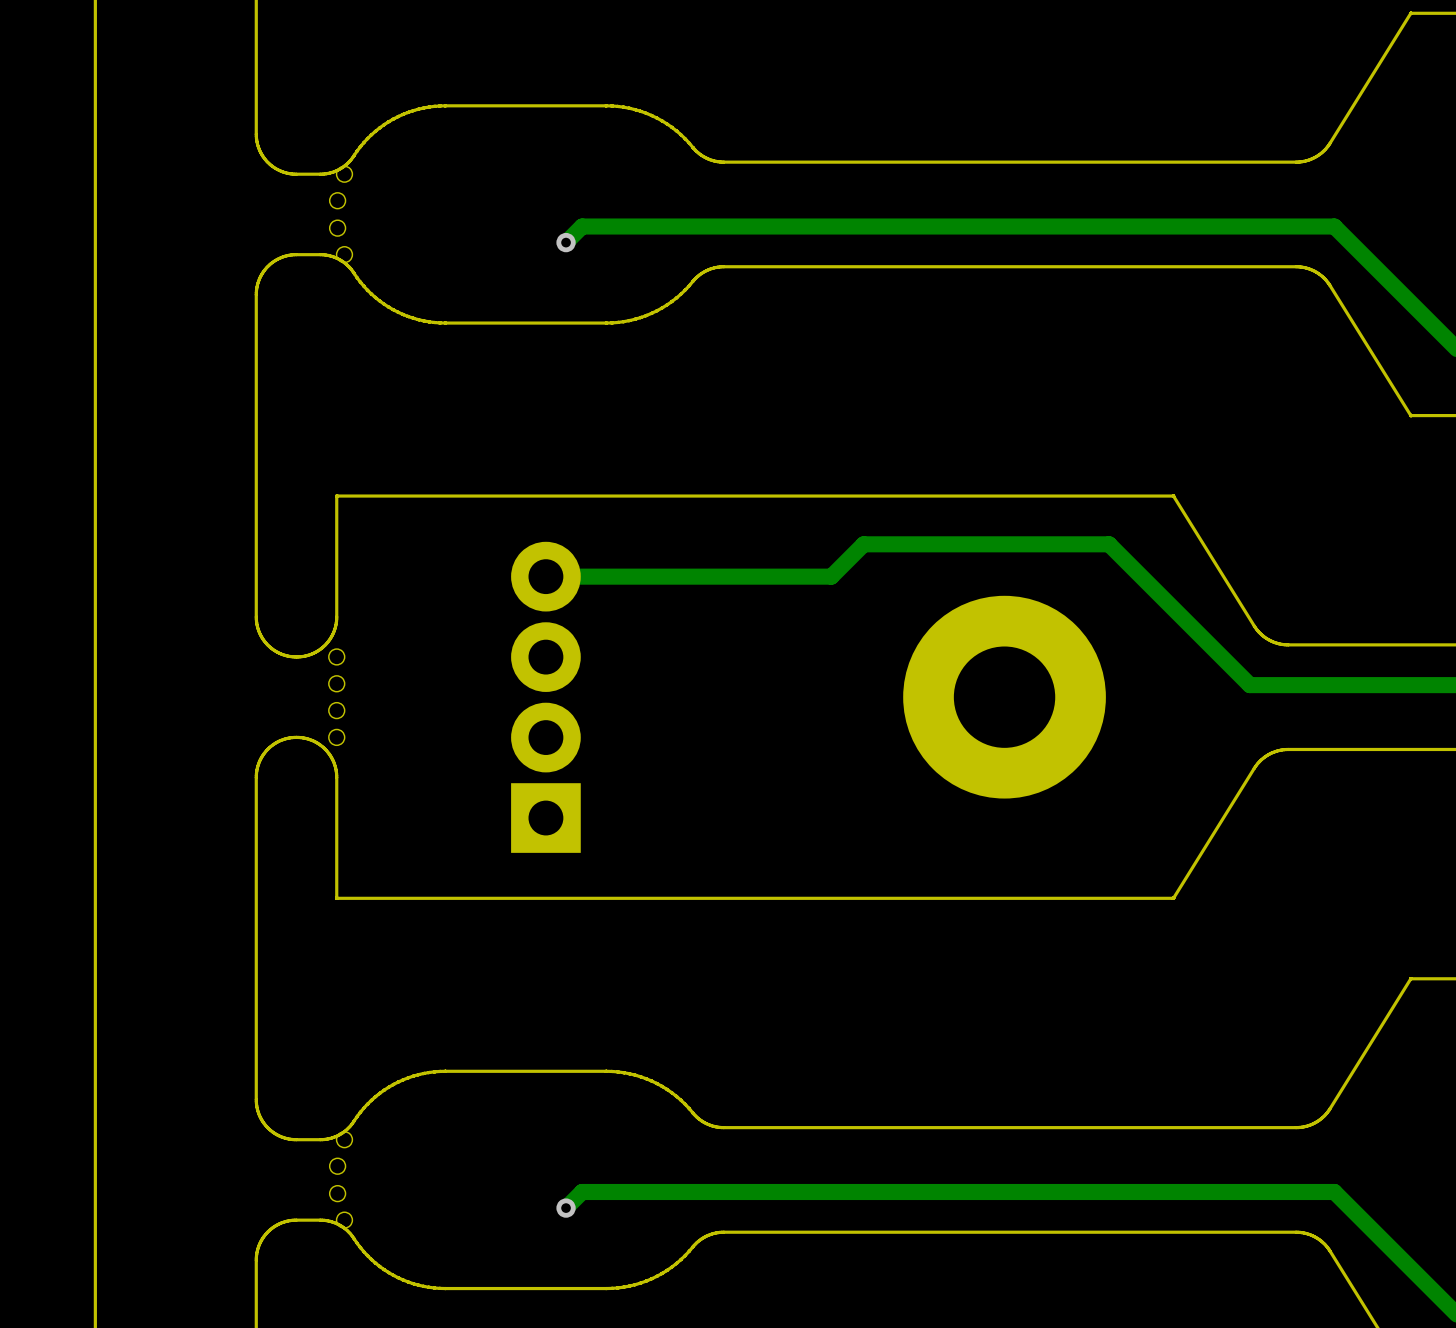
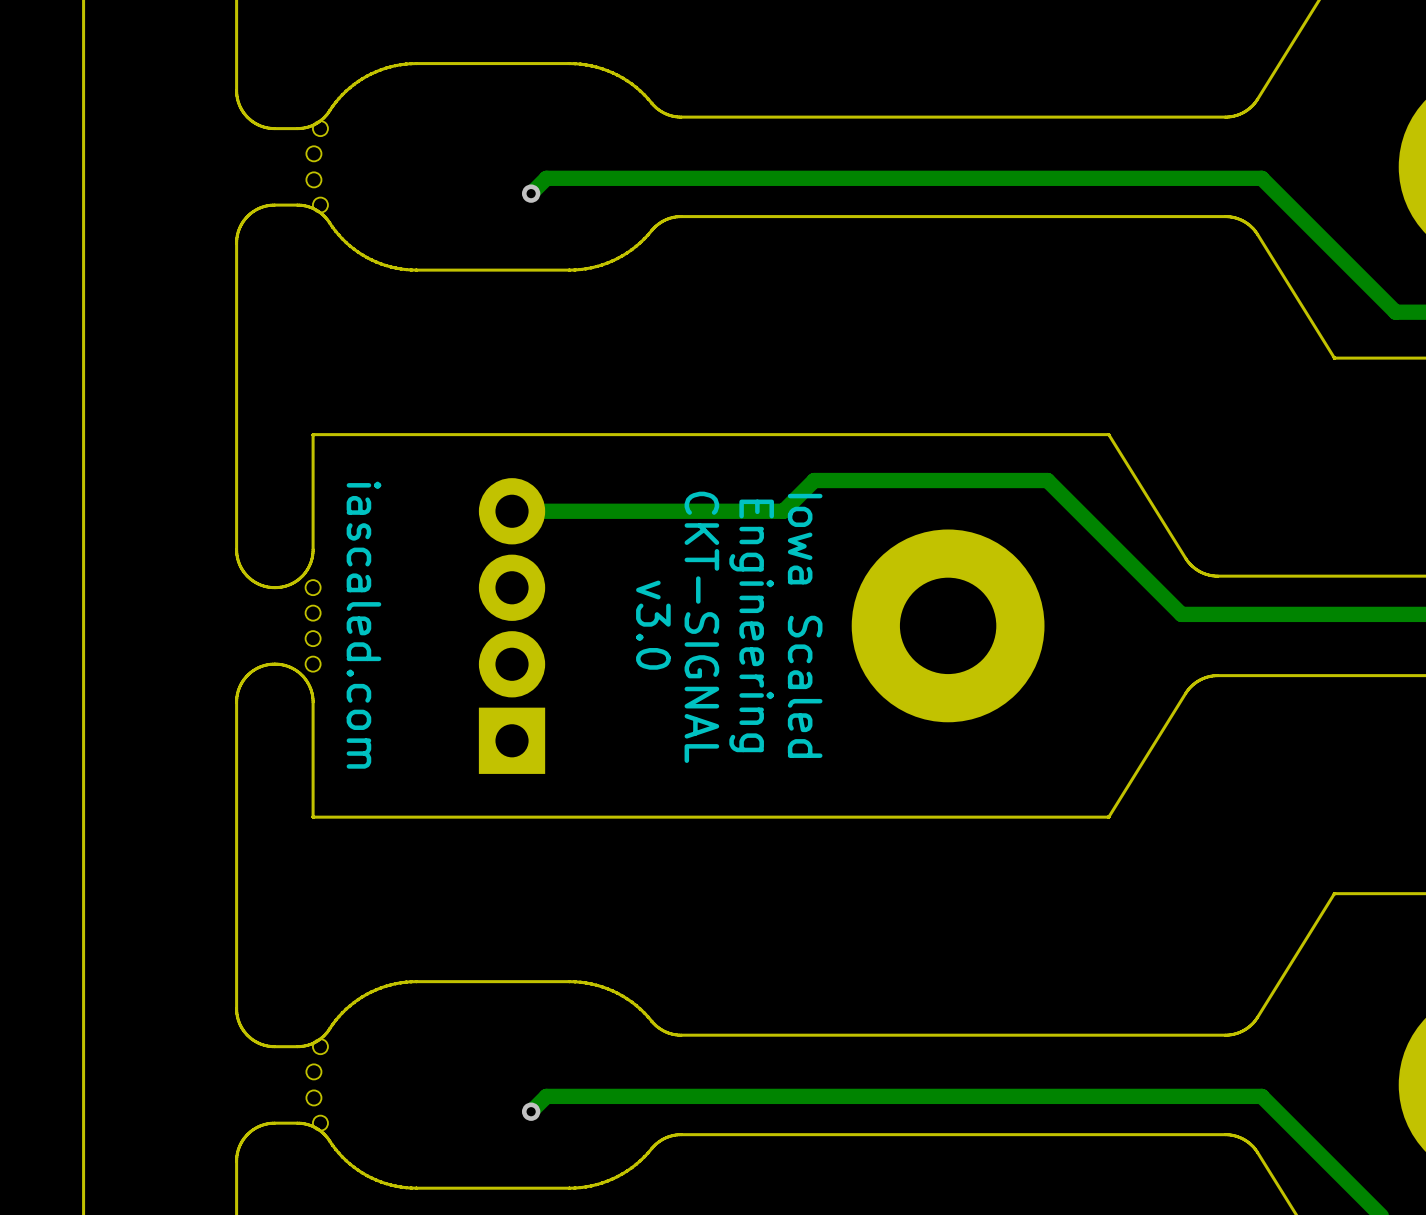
text: none -> iascaled.com (363, 625)
text: none -> v3.0 (653, 625)
text: none -> Engineering (751, 625)
text: none -> Iowa Scaled (805, 625)
text: none -> CKT-SIGNAL (701, 627)

